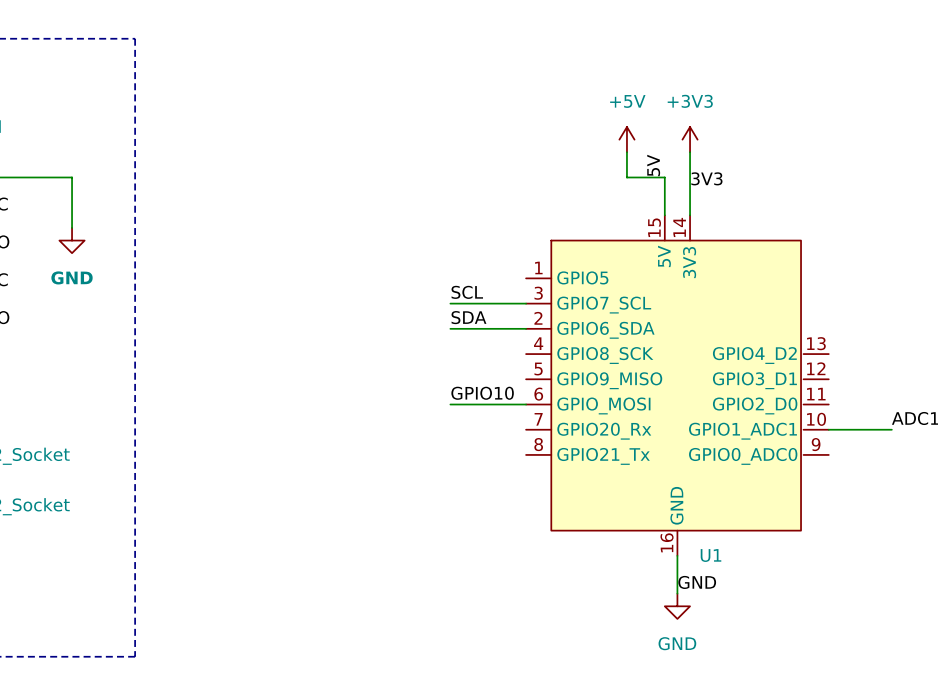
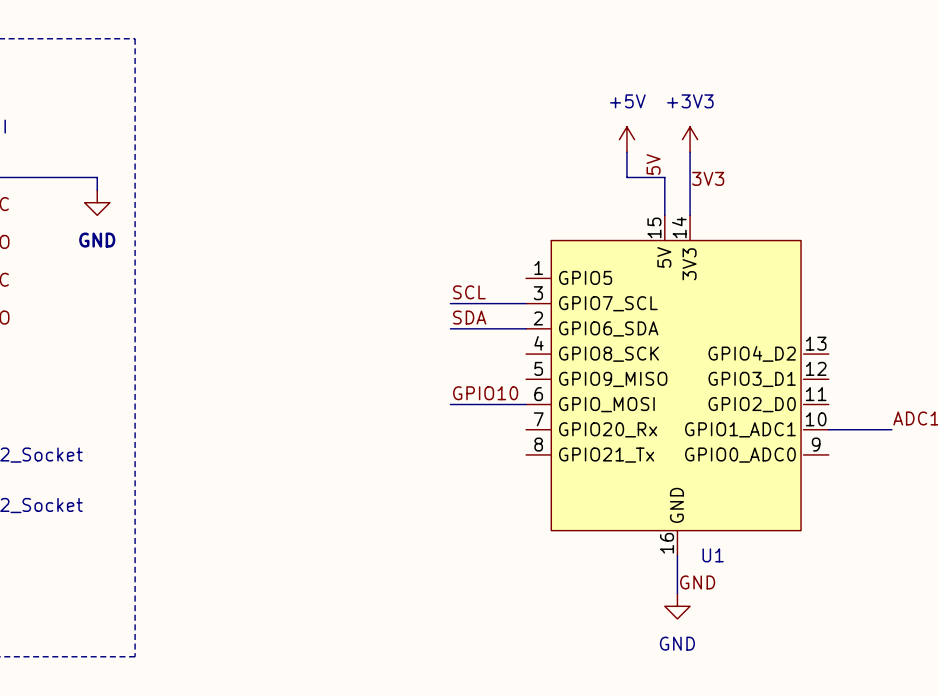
wire: (72, 177) (72, 227) -> (72, 177) (97, 177) (97, 190)
power symbol position: GND (72, 240) -> GND (97, 202)

